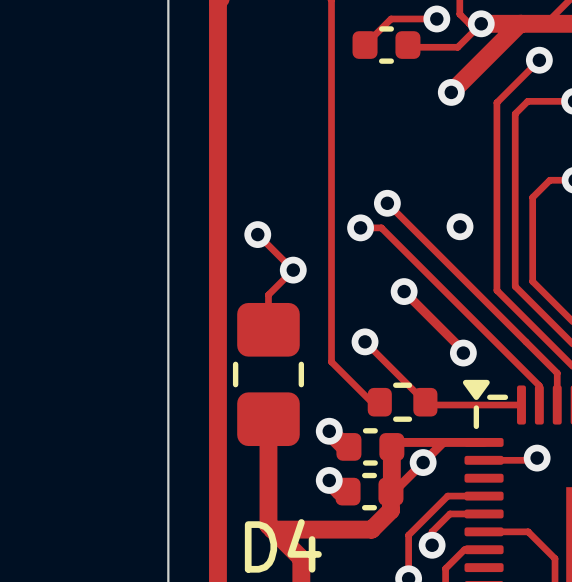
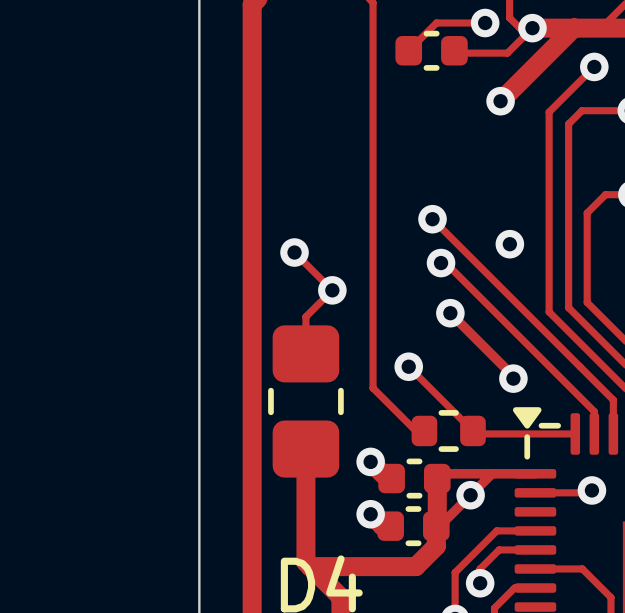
track: (360, 227) (381, 227) (539, 385) -> (441, 263) (445, 267) (450, 267) (594, 413)
via position: (360, 227) -> (441, 263)

